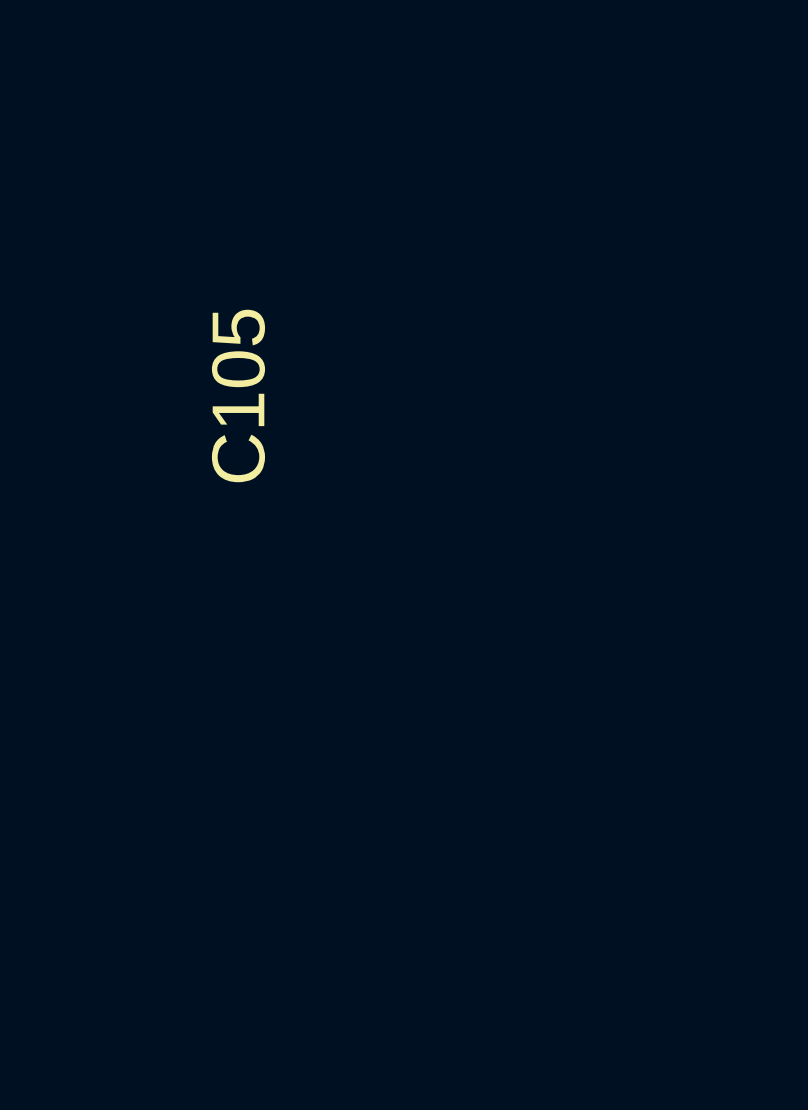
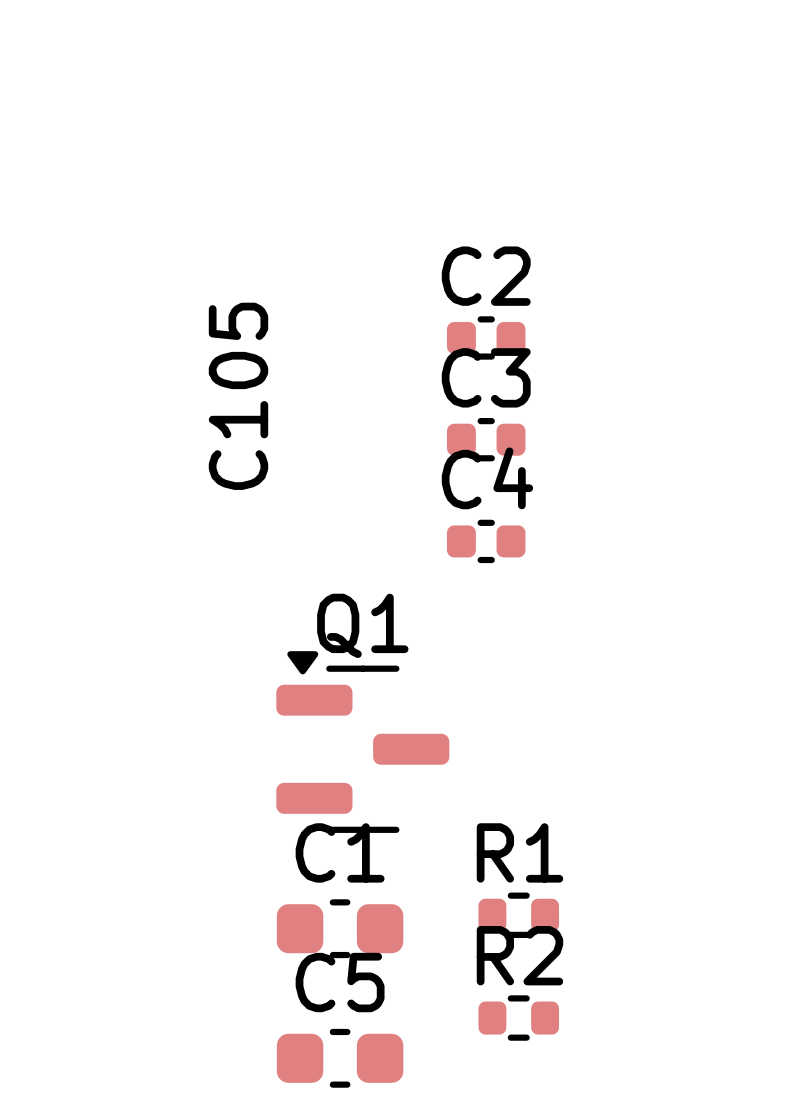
C2: none -> (486, 337)
C3: none -> (486, 439)
C4: none -> (486, 541)
Q1: none -> (362, 742)
R1: none -> (518, 915)
C1: none -> (340, 928)
R2: none -> (518, 1018)
C5: none -> (340, 1058)

